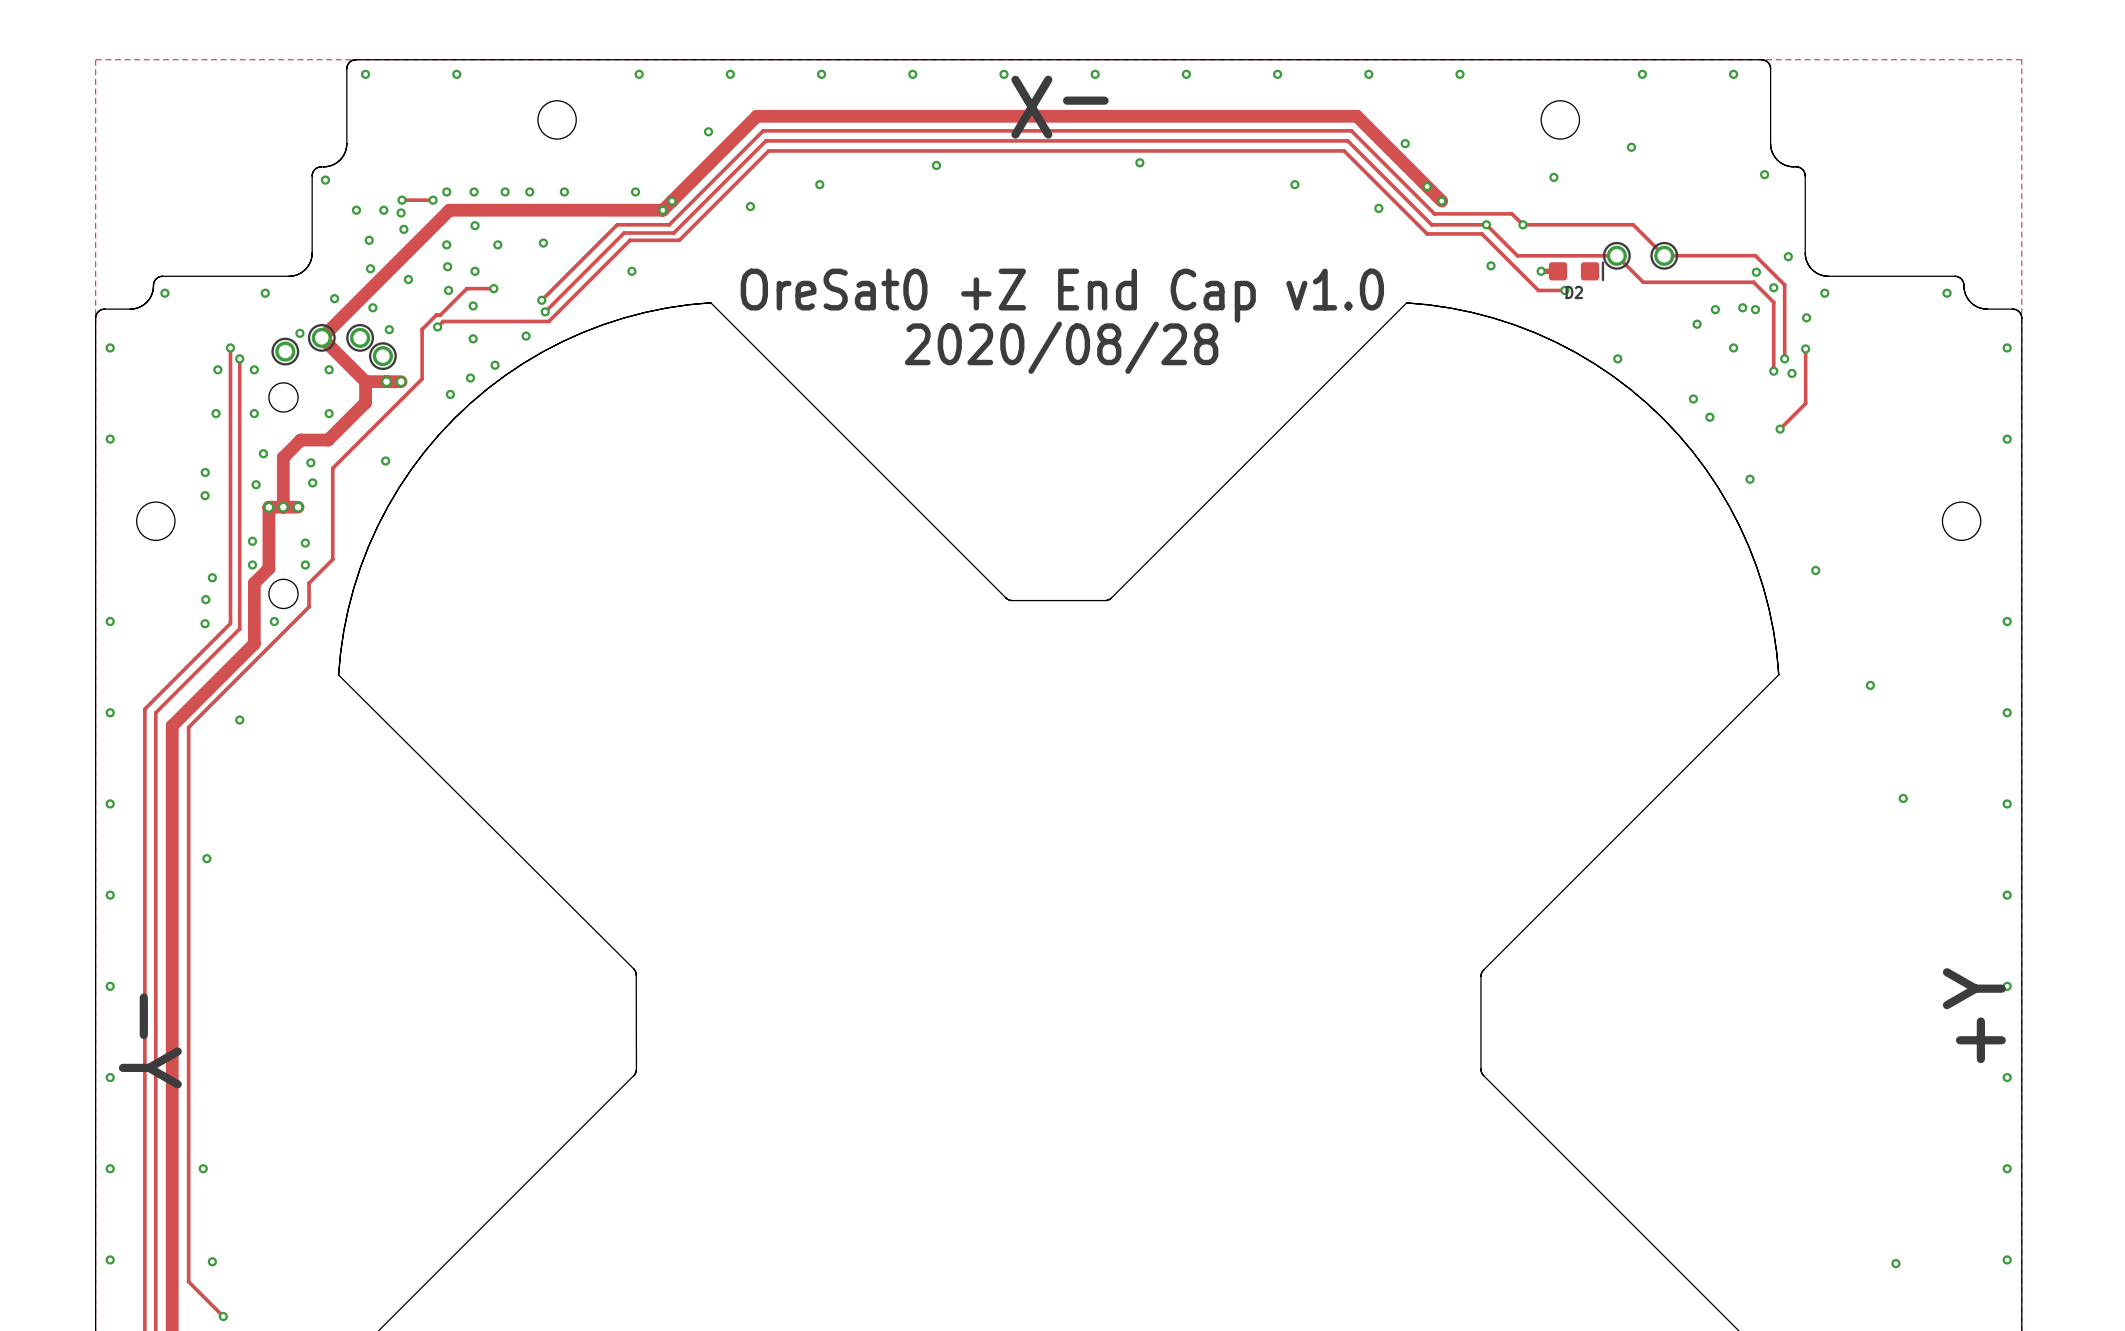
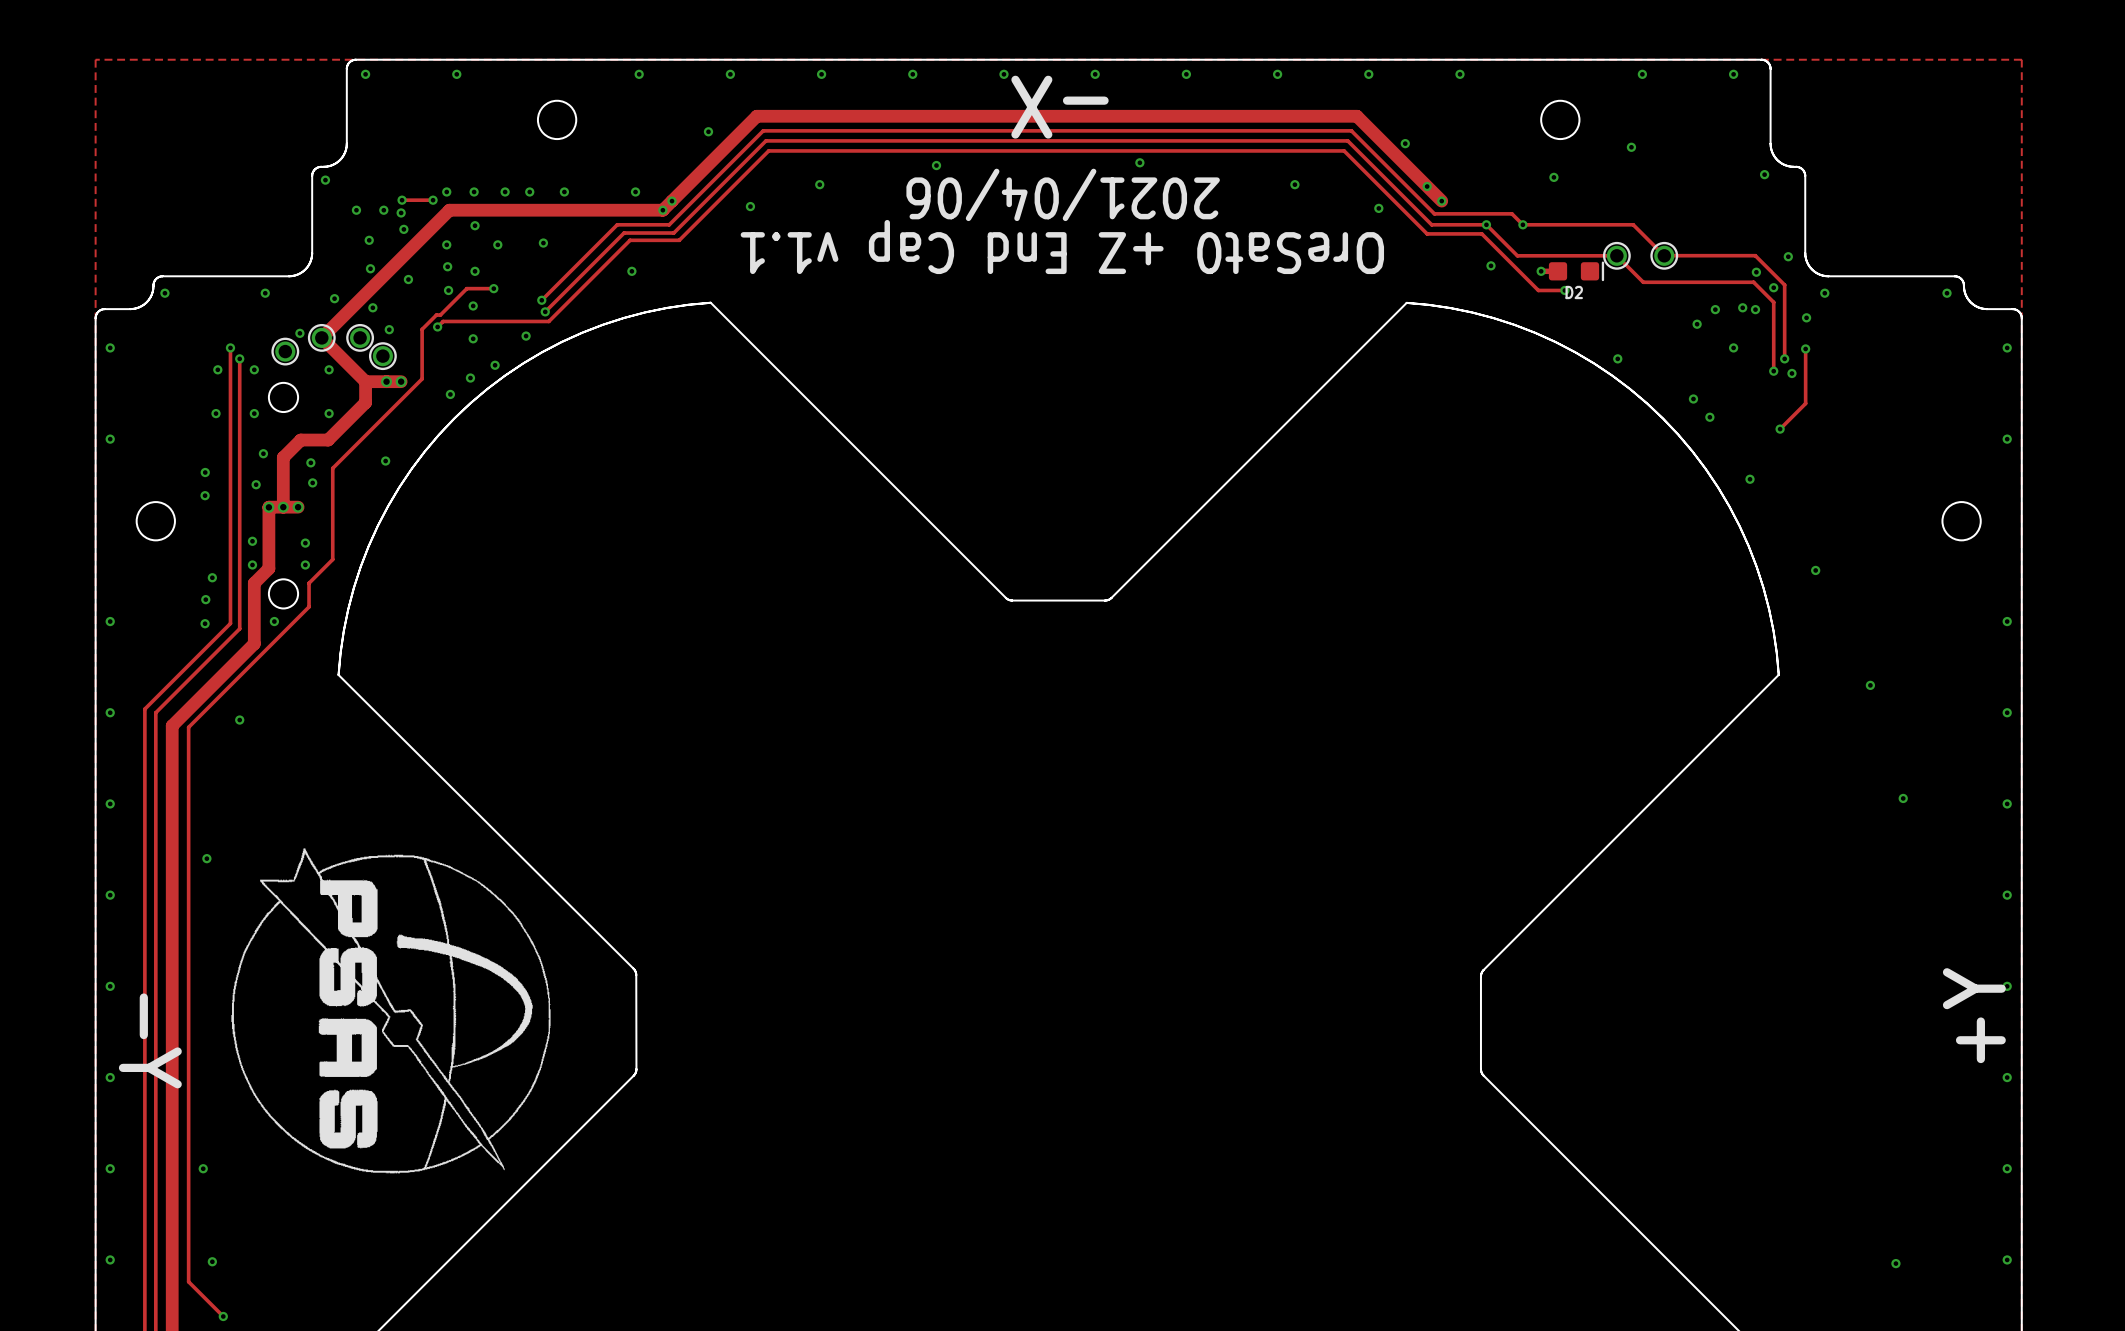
text: none -> 2021/04/06 (1063, 194)
text: OreSat0 +Z End Cap v1.0 (1062, 295) -> OreSat0 +Z End Cap v1.1 (1062, 247)
text: 2020/08/28 (1061, 347) -> none
drawing: none -> [231, 848, 551, 1174]

